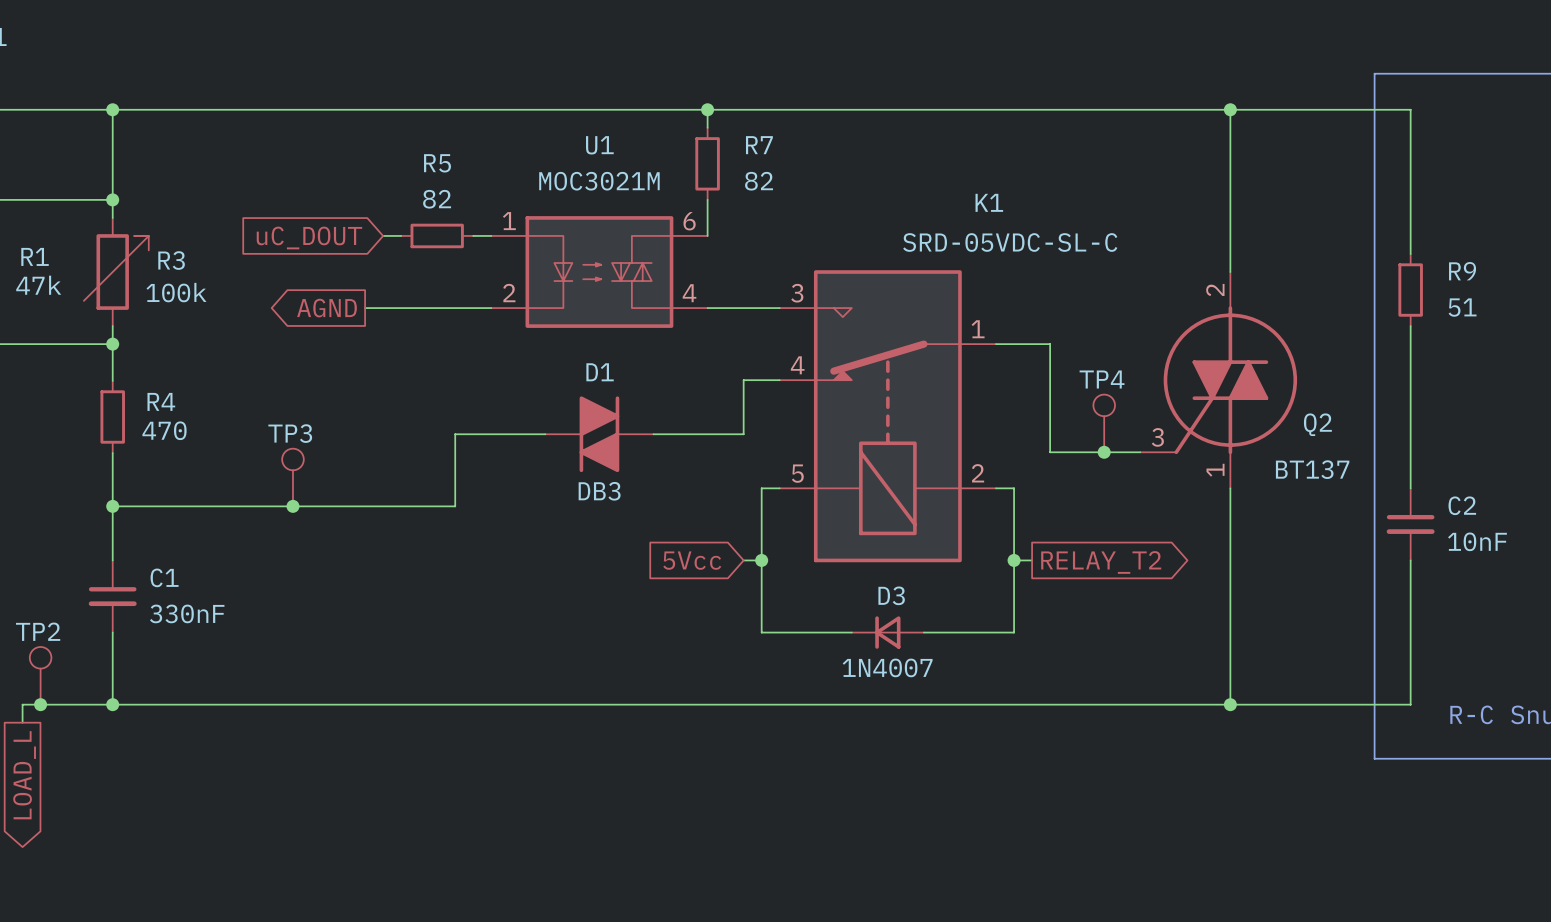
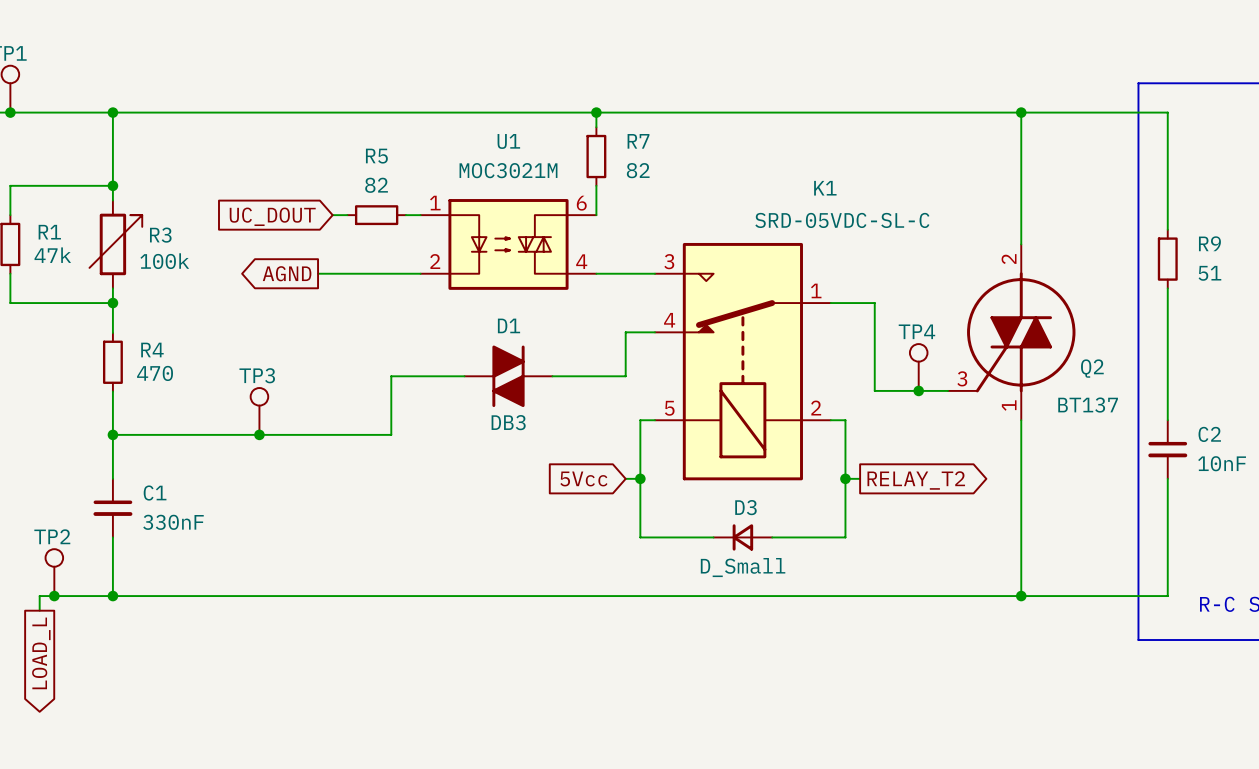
global label: uC_DOUT (309, 237) -> UC_DOUT (272, 216)
D3 value: 1N4007 (887, 667) -> D_Small (743, 567)

